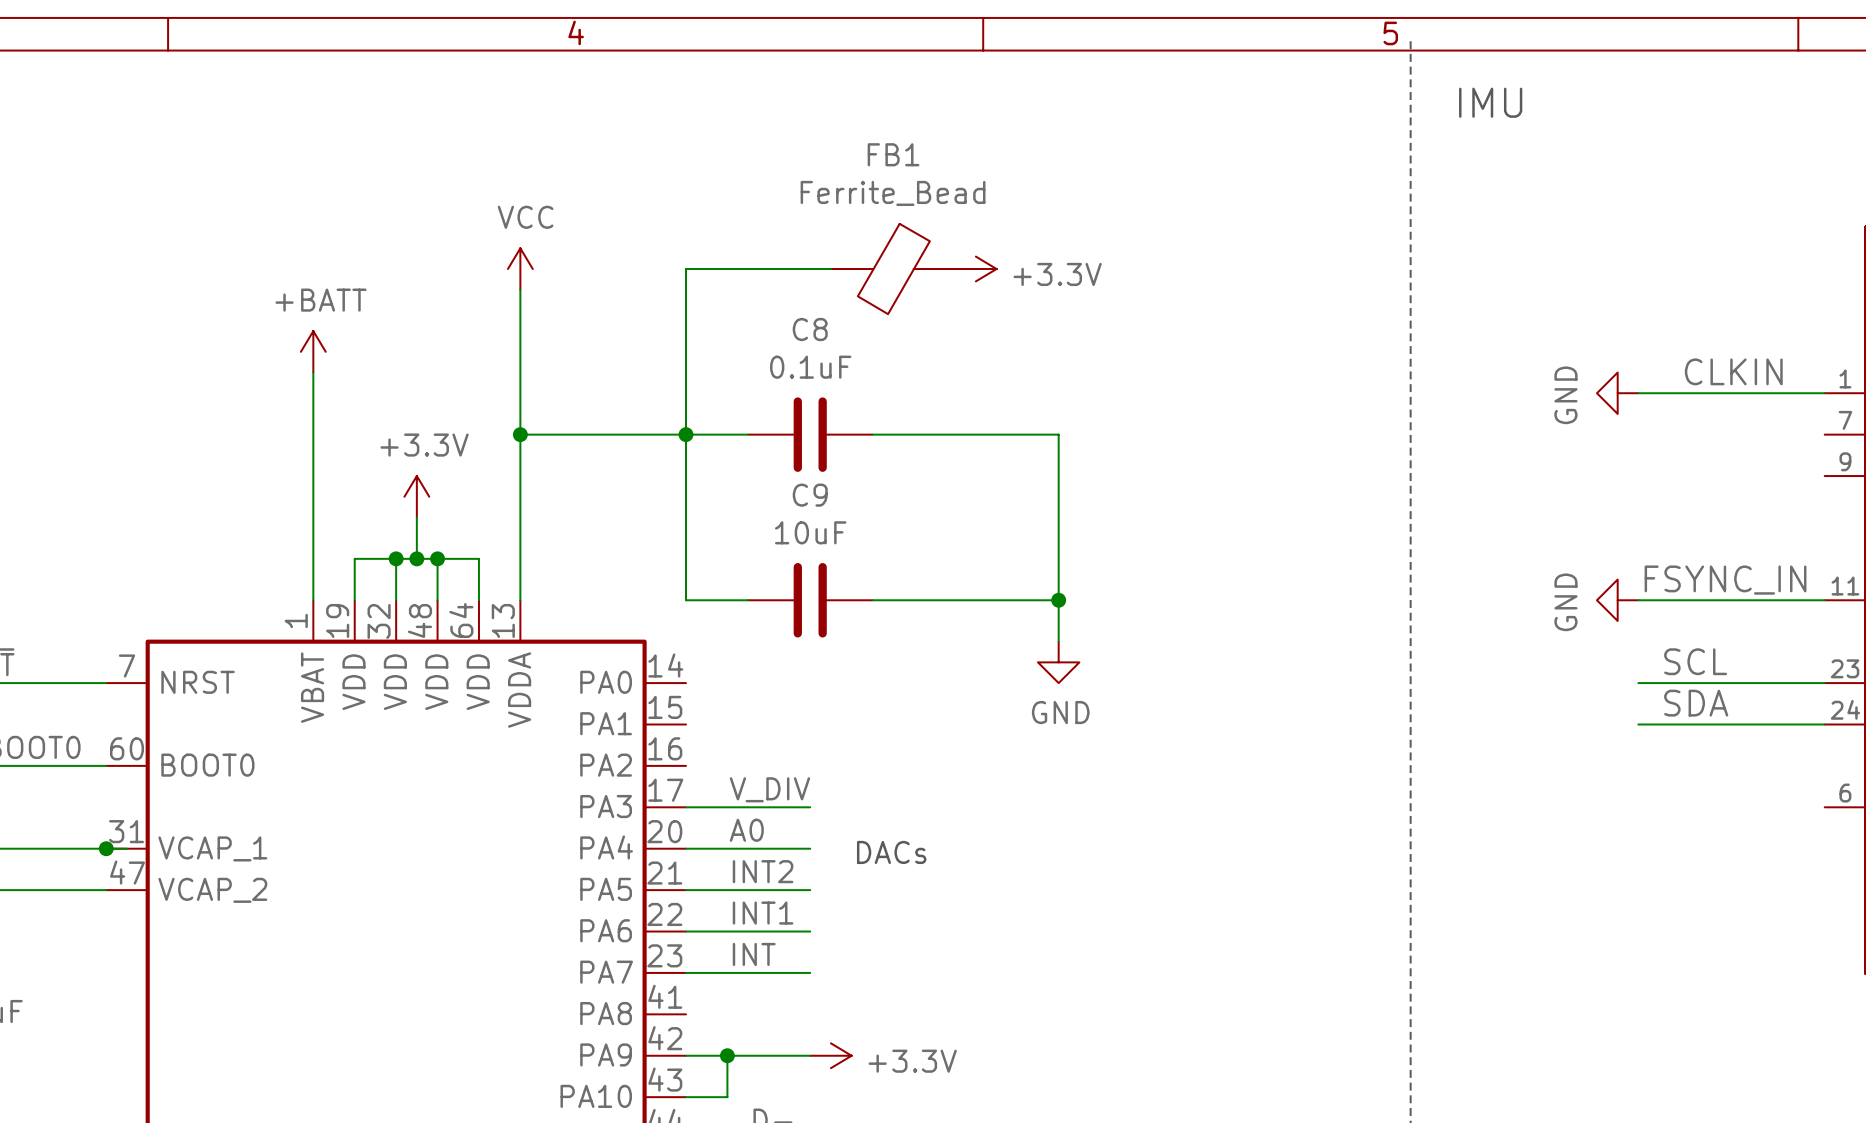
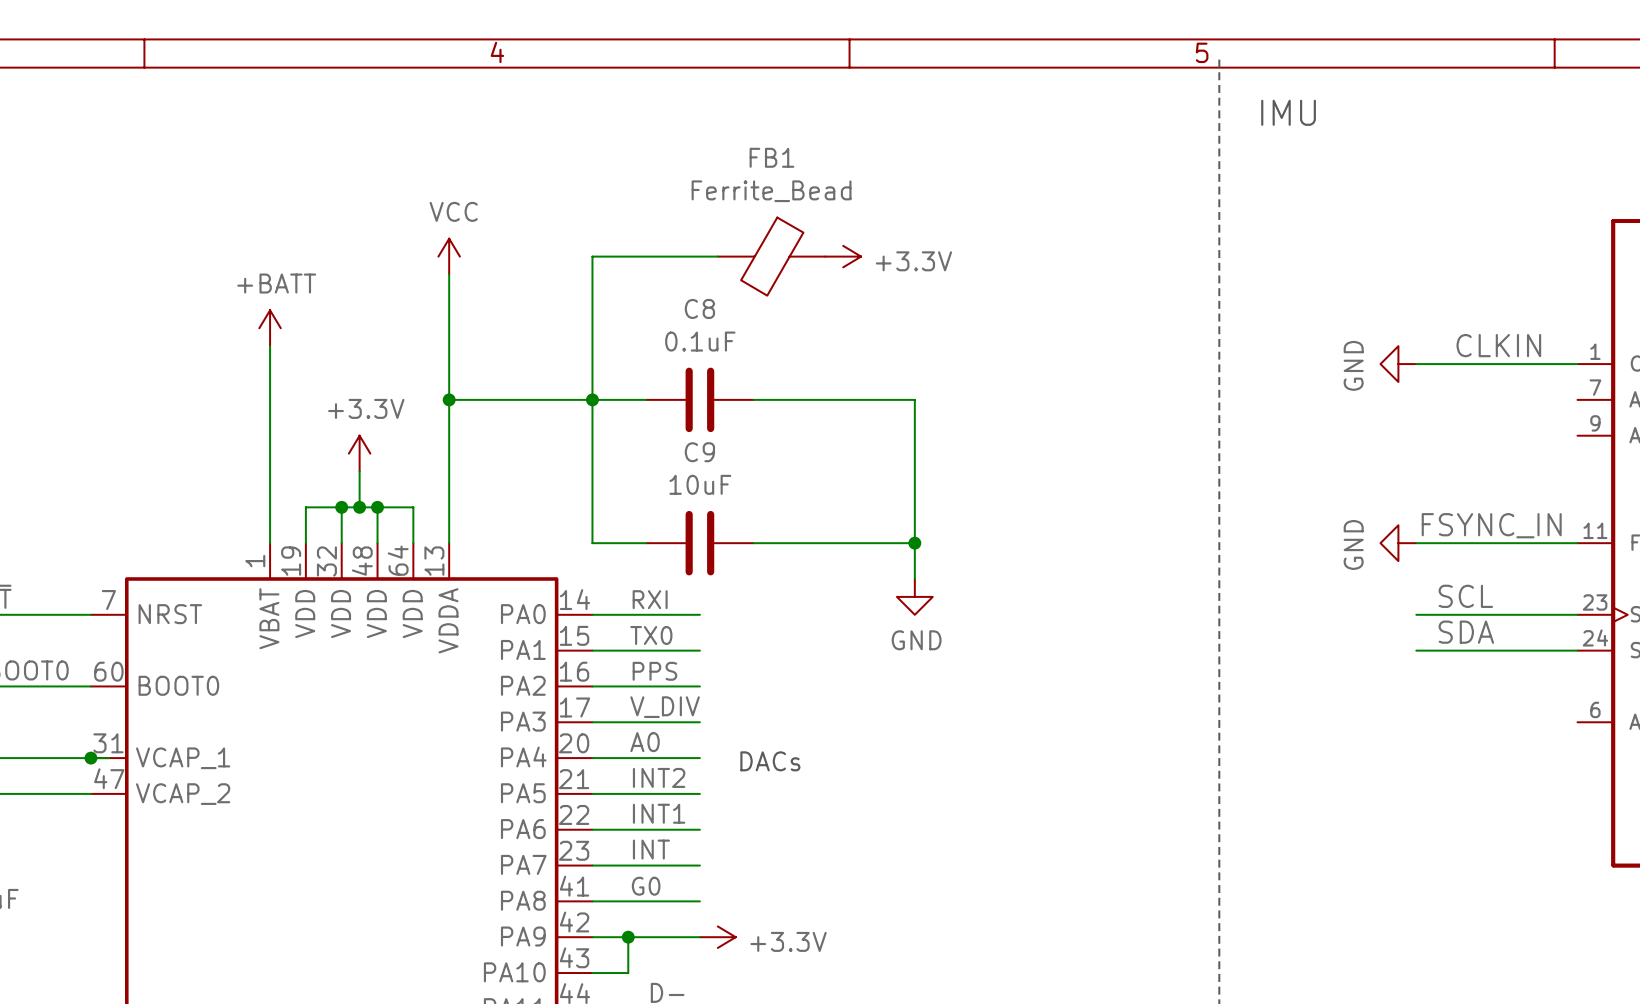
label: none -> RXI (650, 599)
wire: none -> (592, 614) (699, 614)
label: none -> TX0 (651, 635)
wire: none -> (592, 650) (699, 650)
label: none -> PPS (654, 671)
wire: none -> (592, 686) (699, 686)
label: none -> G0 (646, 886)
wire: none -> (592, 901) (699, 901)

